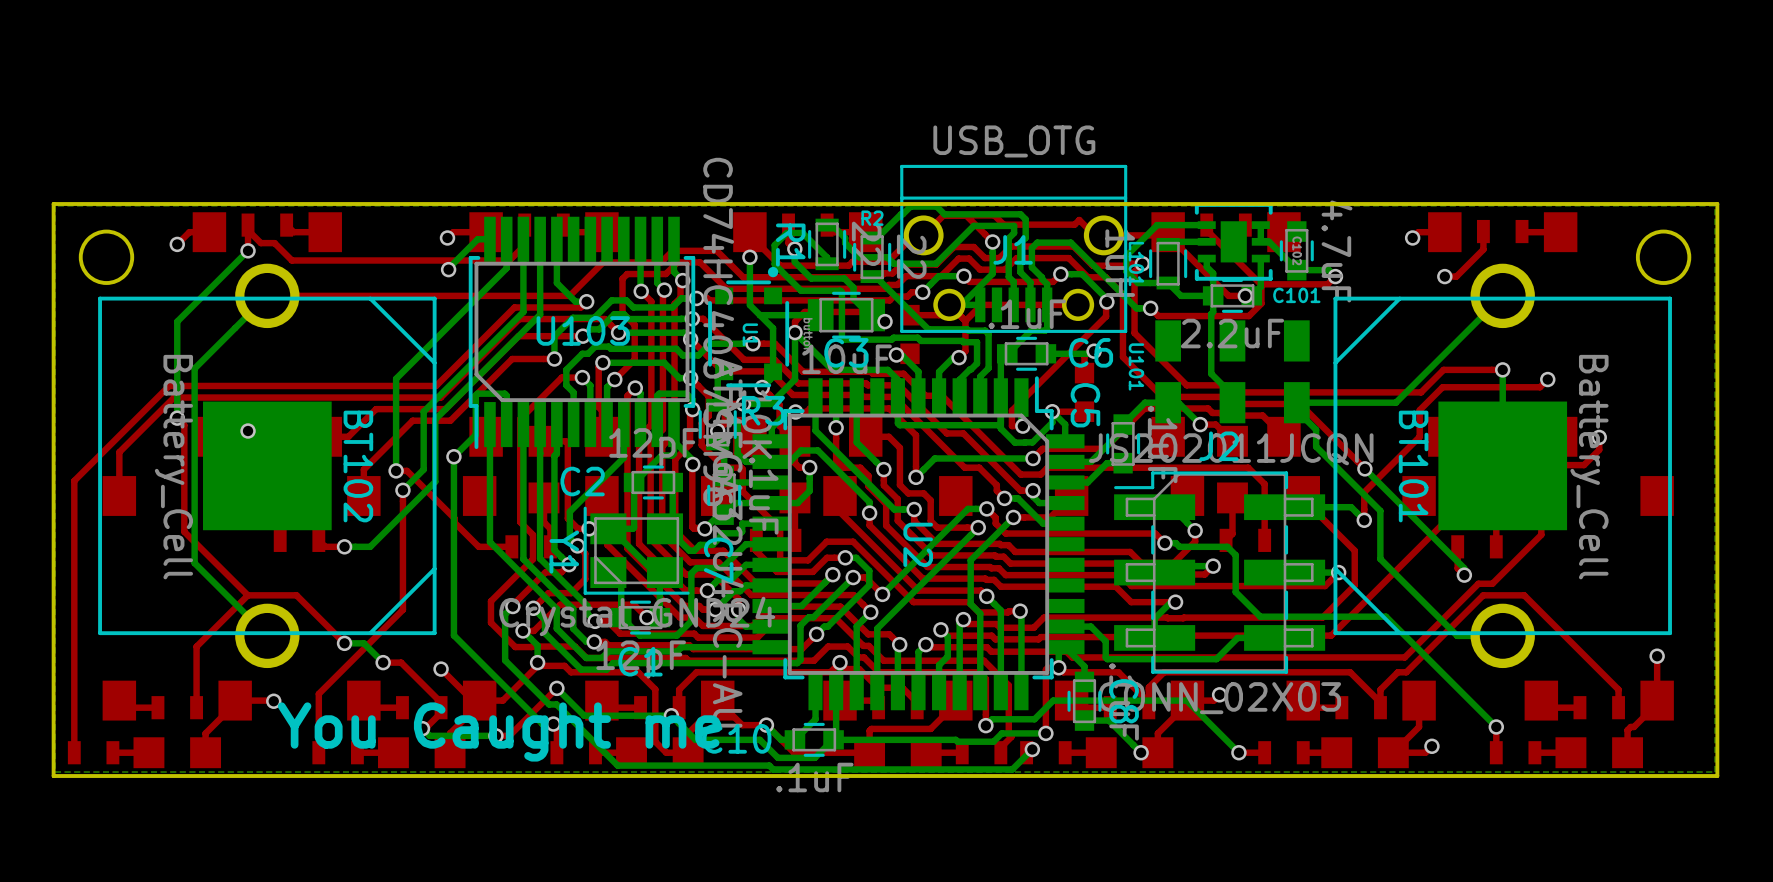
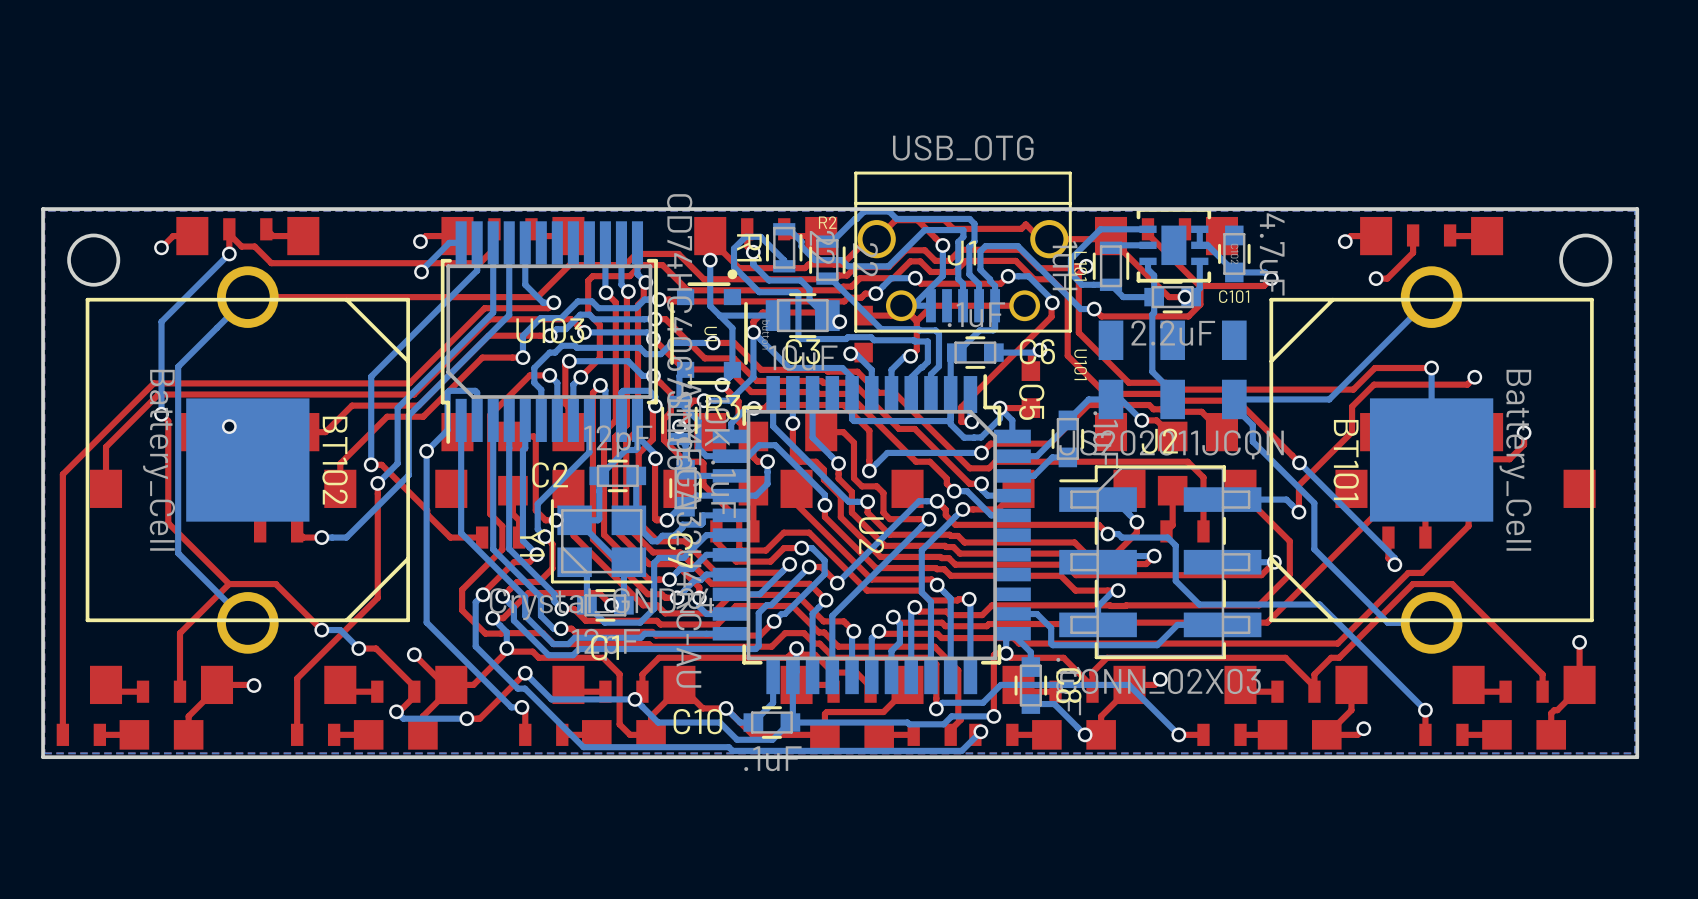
text: You Caught me (499, 731) -> none

